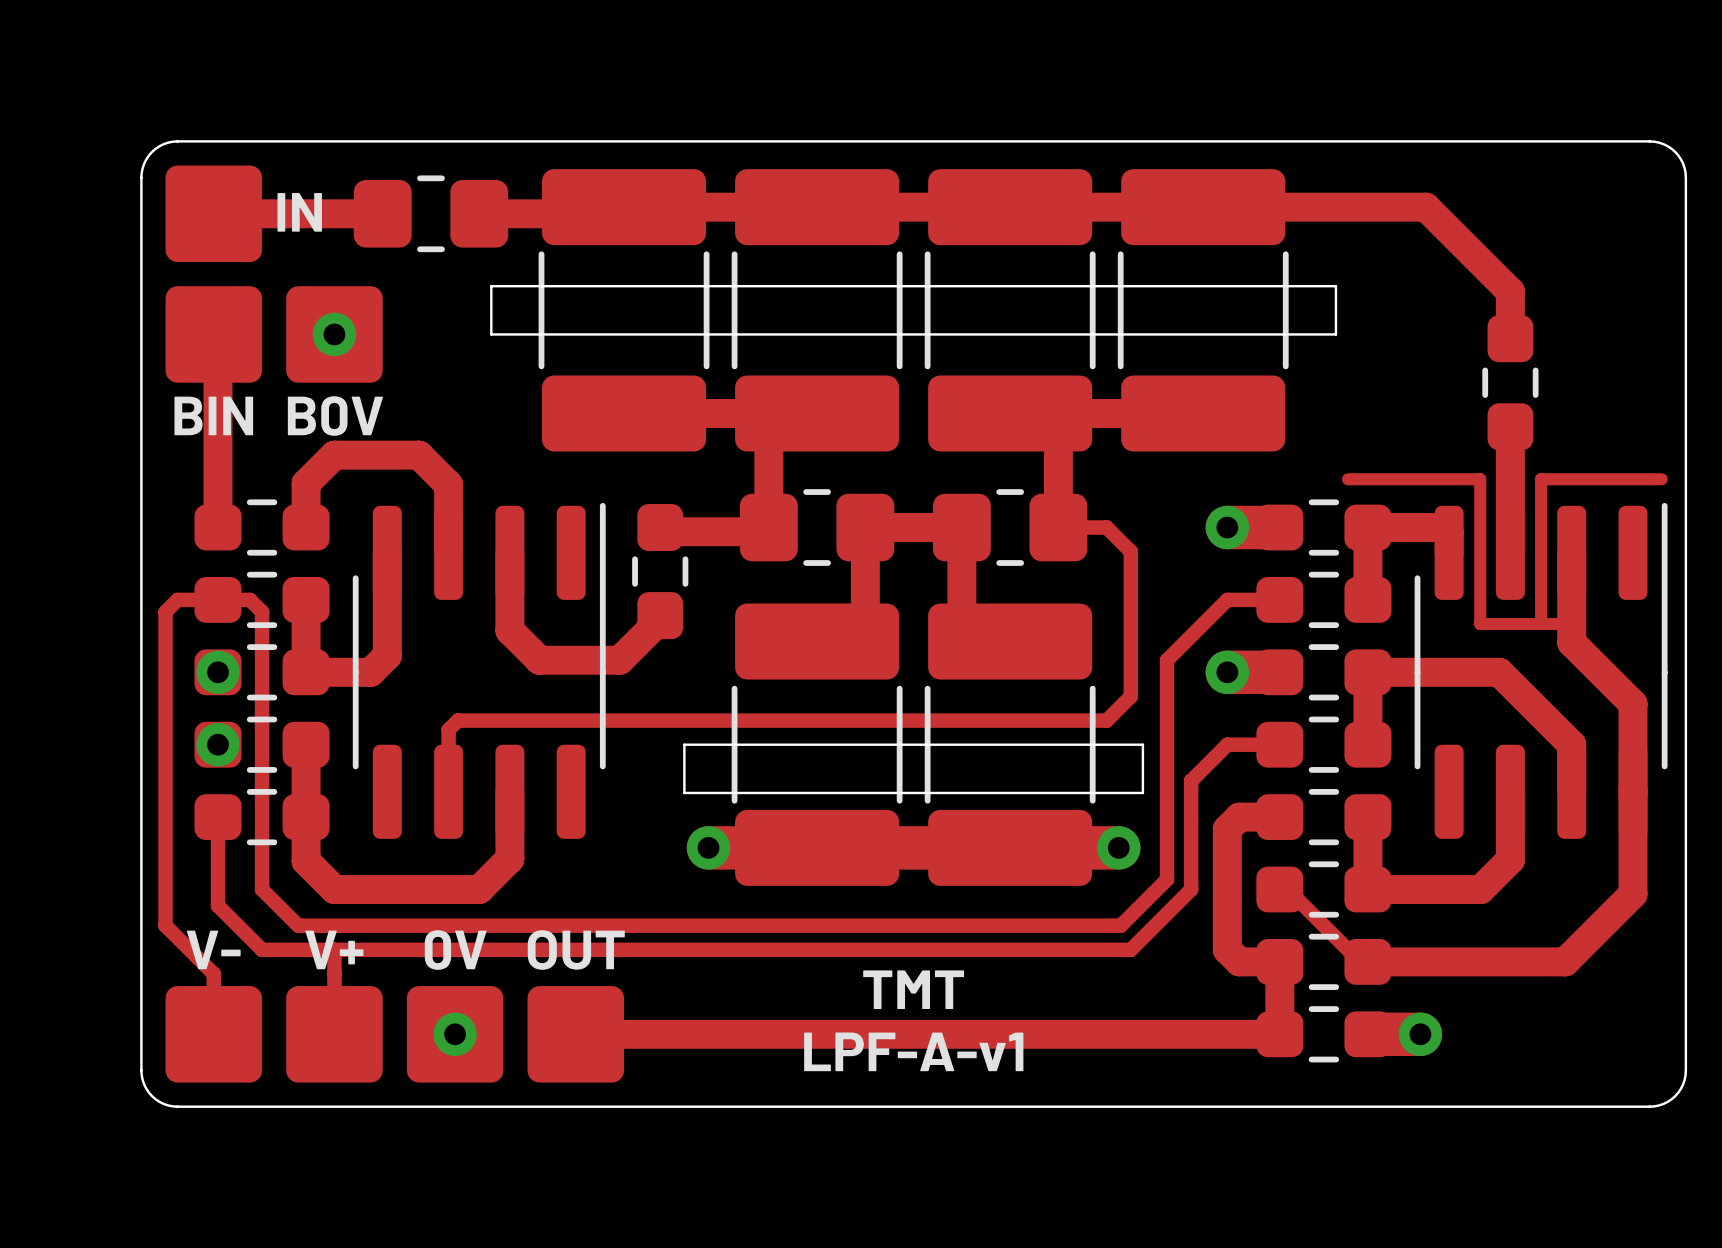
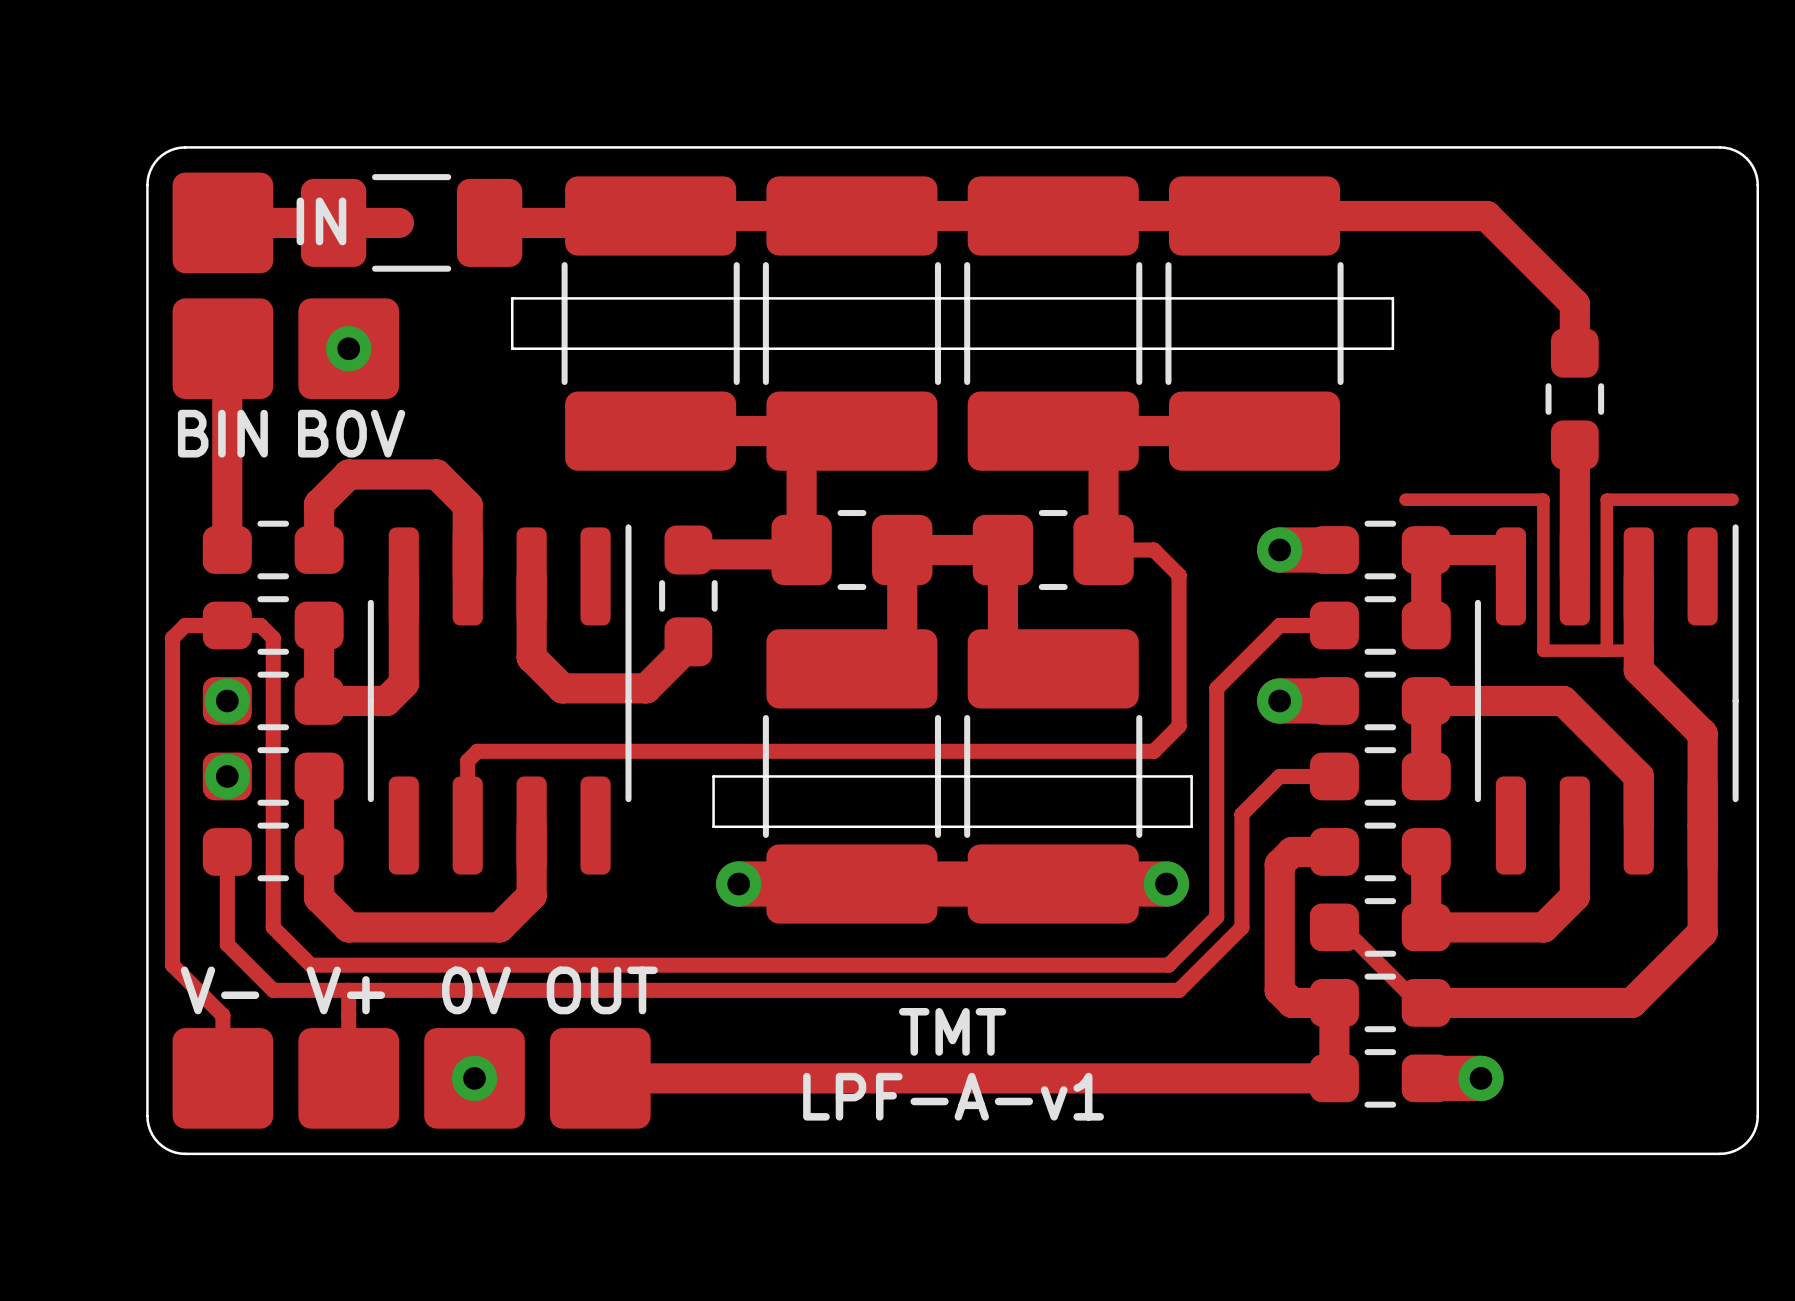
part footprint: [353, 175, 509, 253] -> [300, 174, 523, 272]

